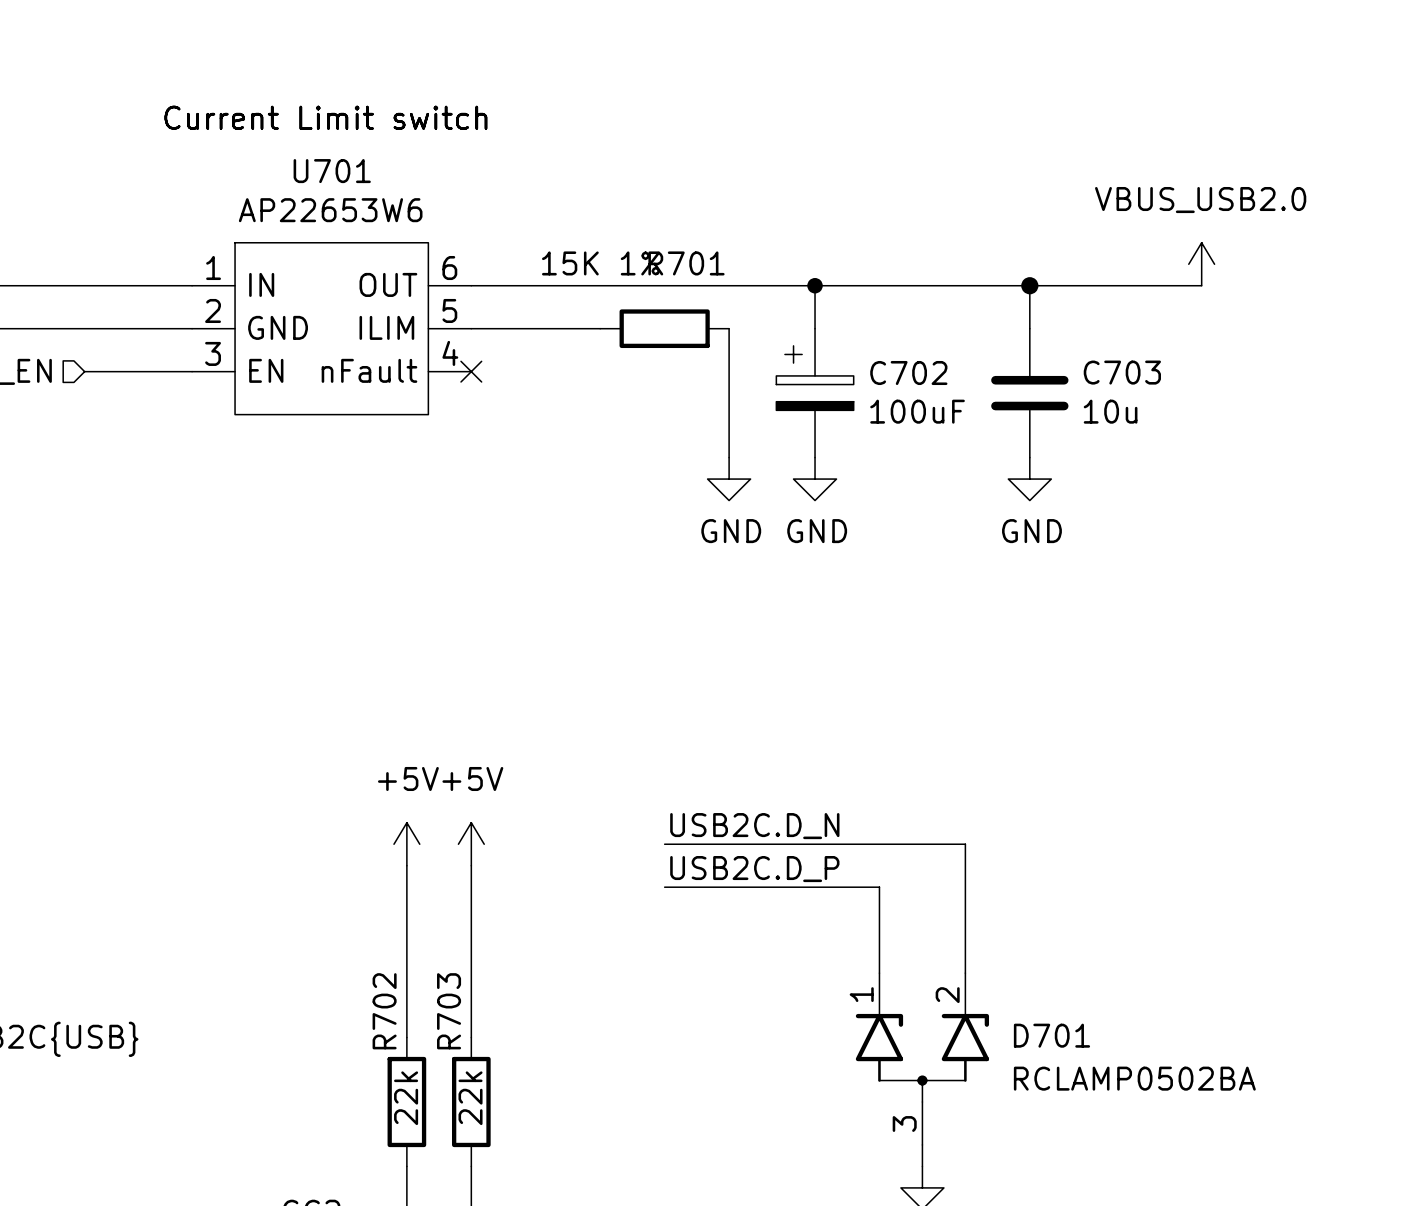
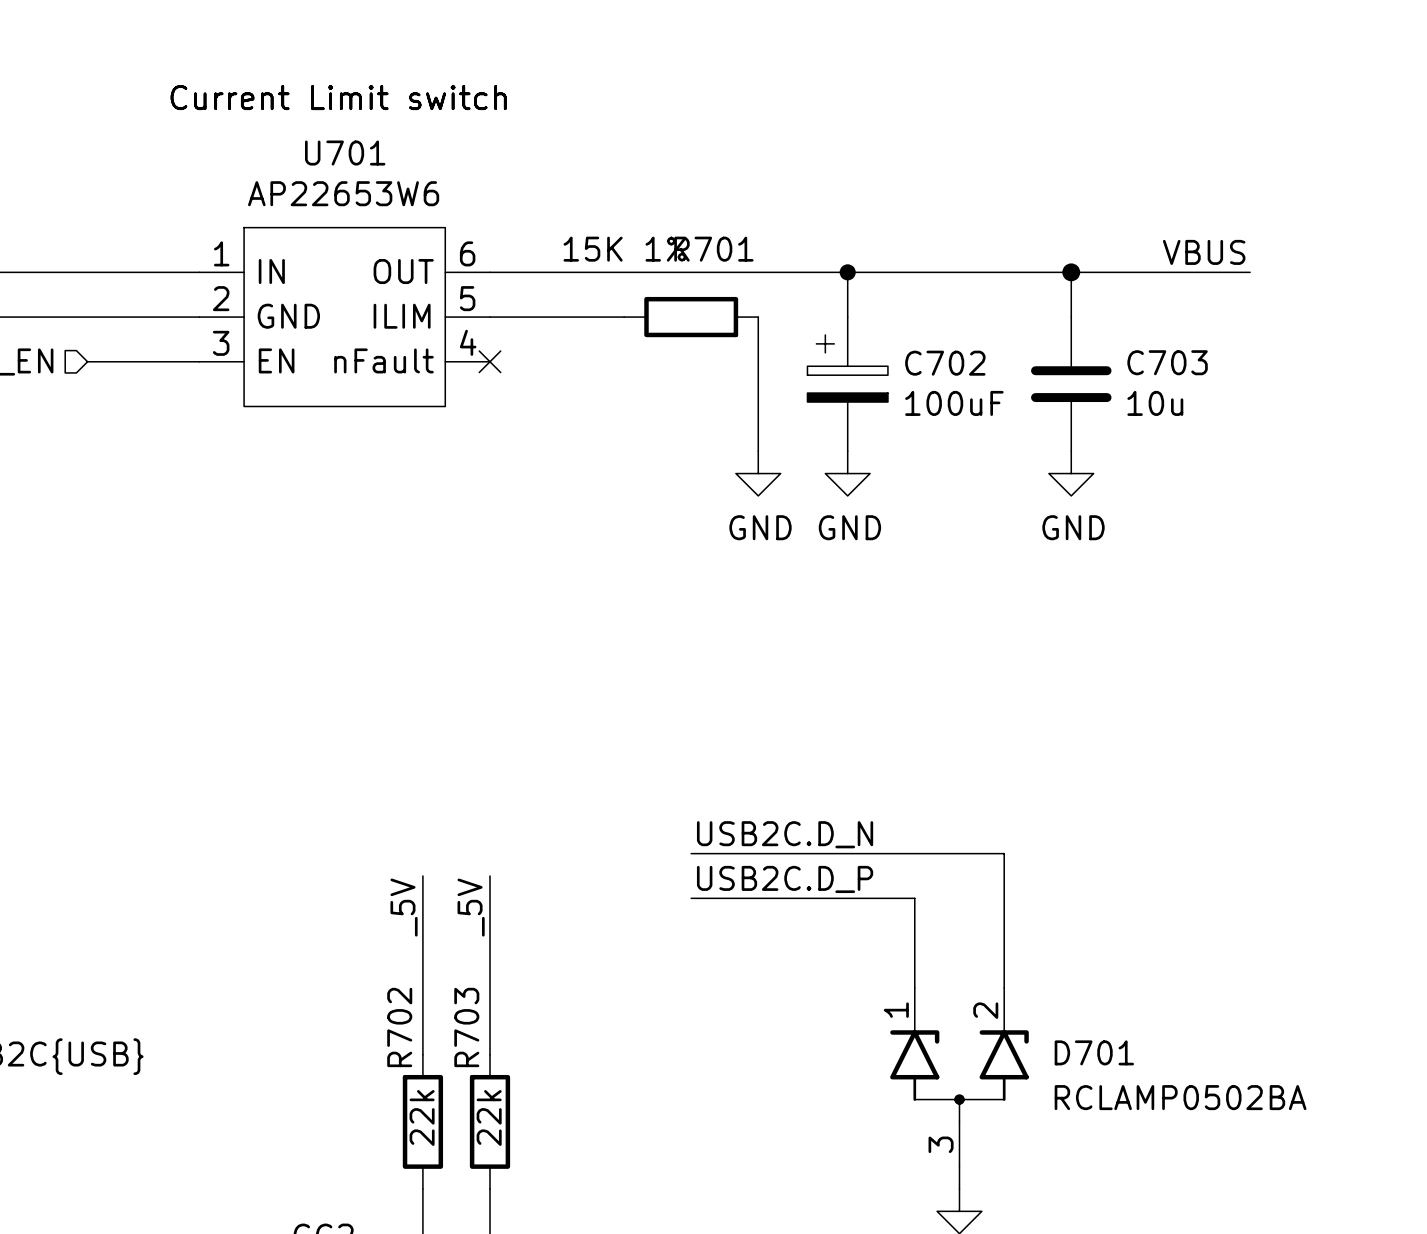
power symbol: VBUS_USB2.0 (1201, 264) -> none
label: none -> VBUS (1204, 252)
power symbol: +5V (406, 844) -> none
power symbol: +5V (471, 844) -> none
label: none -> _5V (404, 907)
label: none -> _5V (471, 907)

